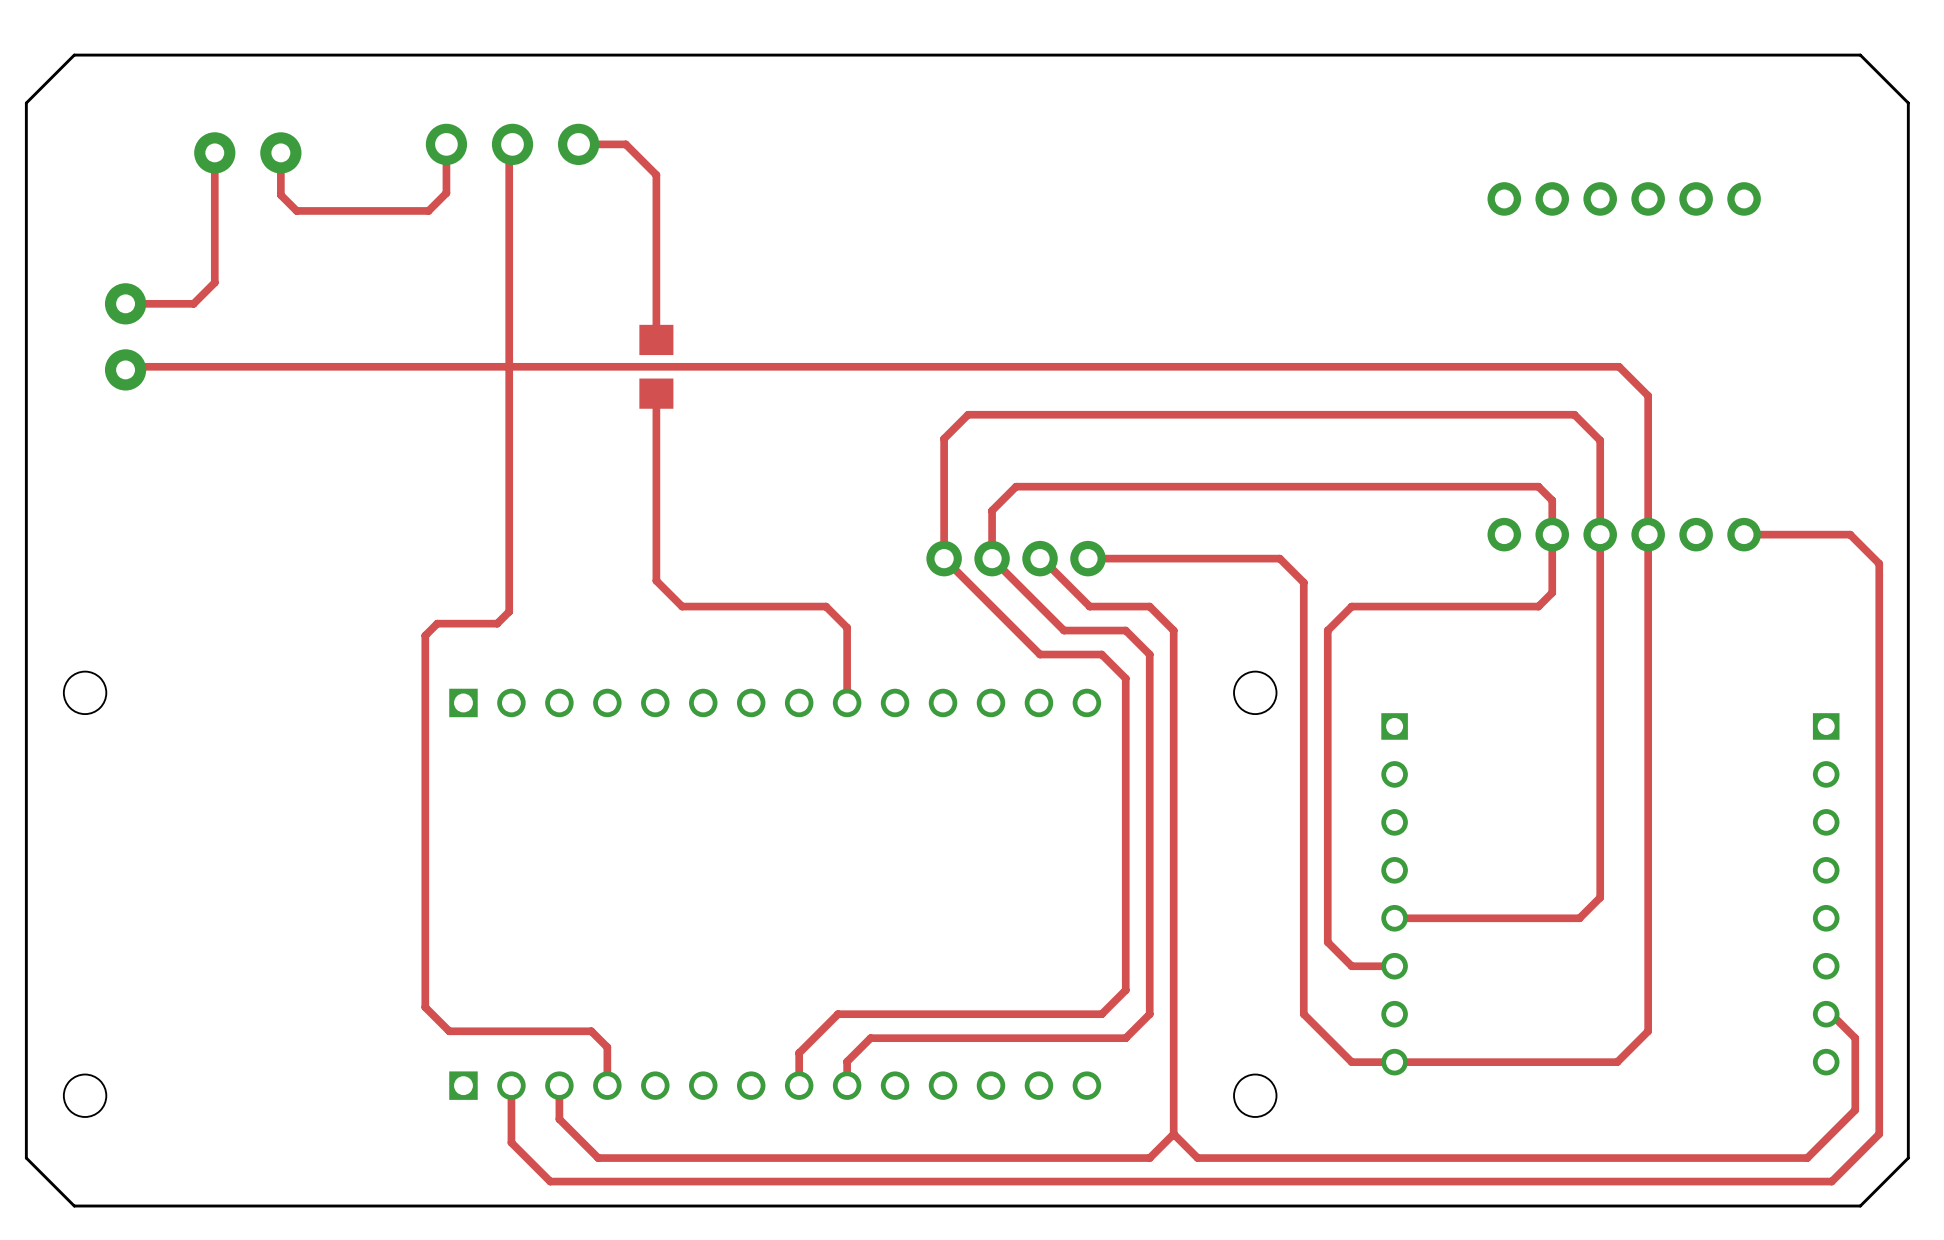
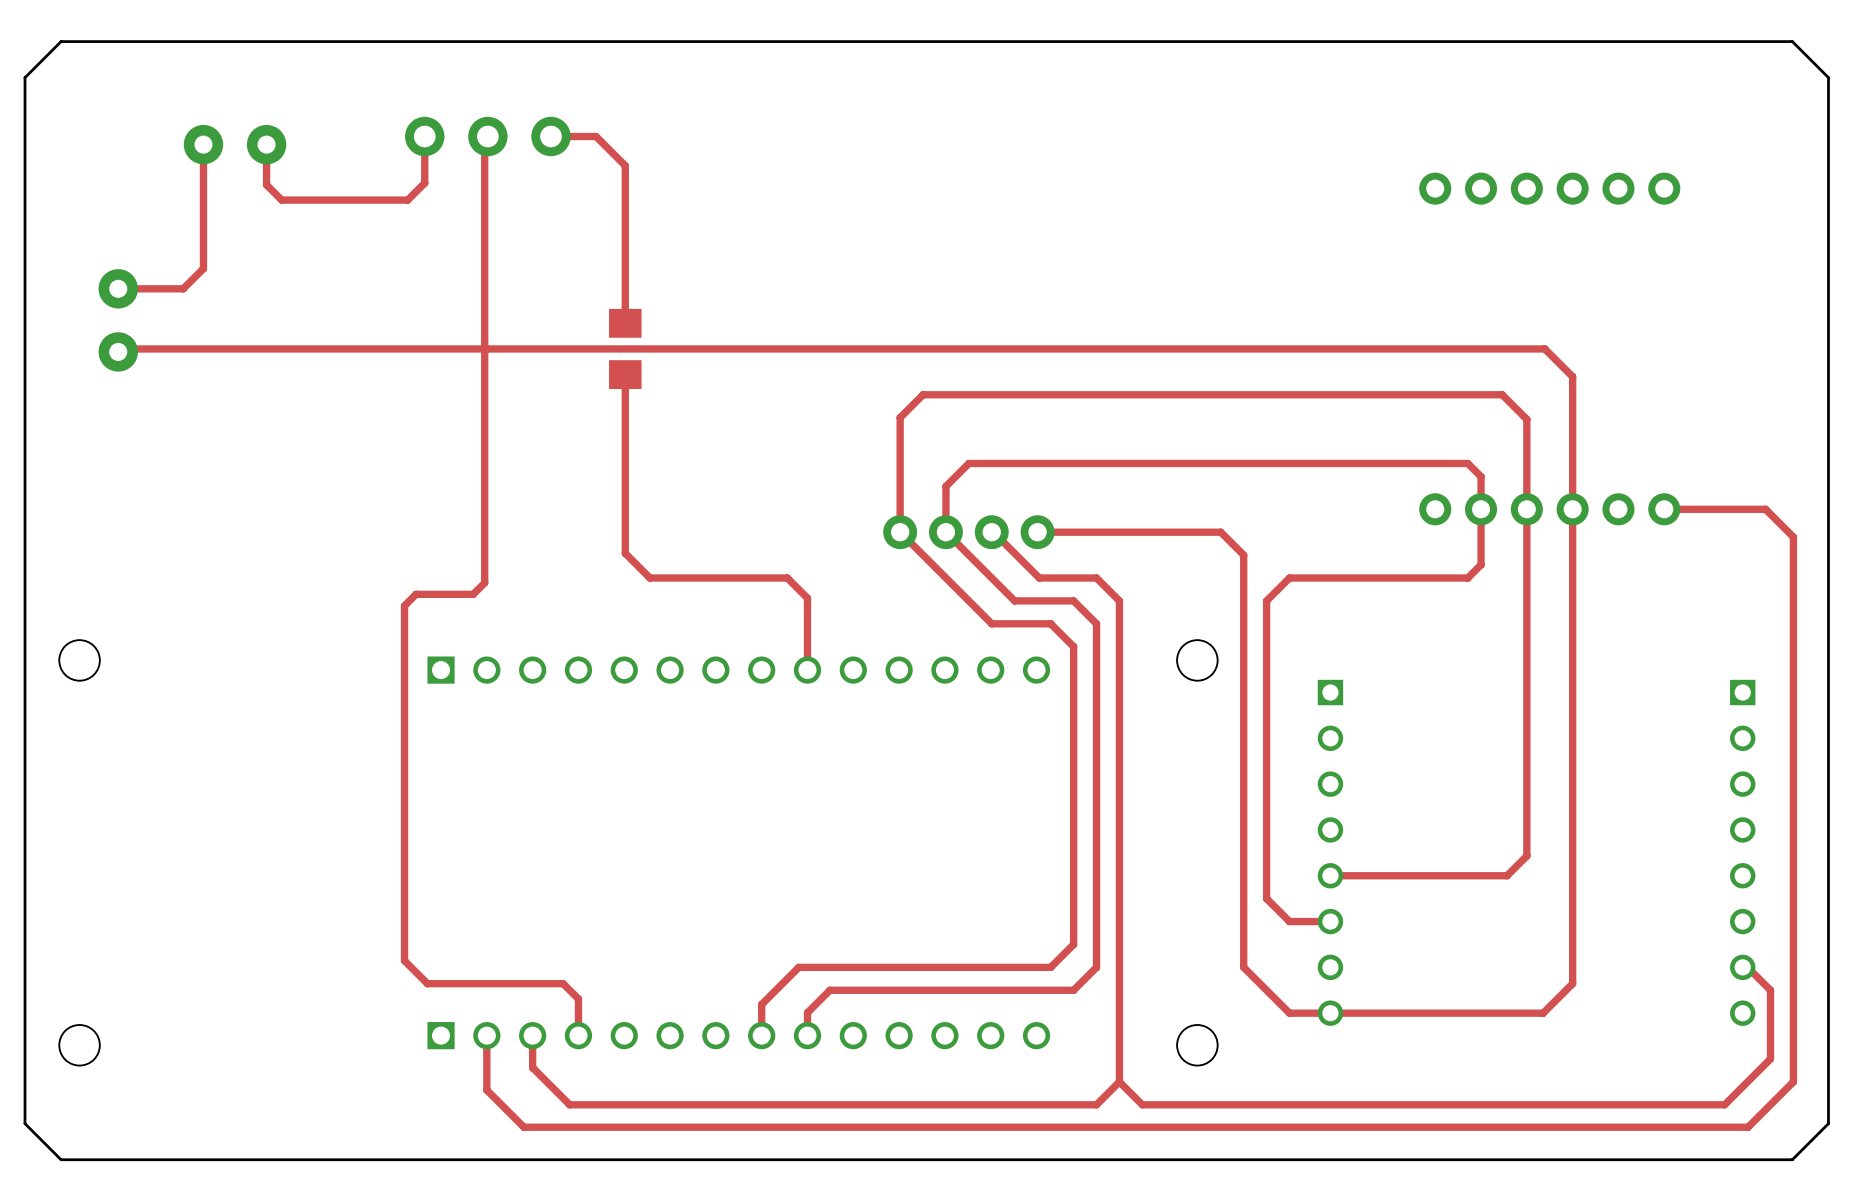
board edge: (1860, 55) (74, 55) (26, 103) (26, 1158) (74, 1206) (1860, 1206) (1908, 1158) (1908, 103) (1860, 55) -> (1792, 41) (1828, 77) (1828, 1123) (1792, 1159) (61, 1159) (24, 1123) (24, 77) (61, 41) (1792, 41)

